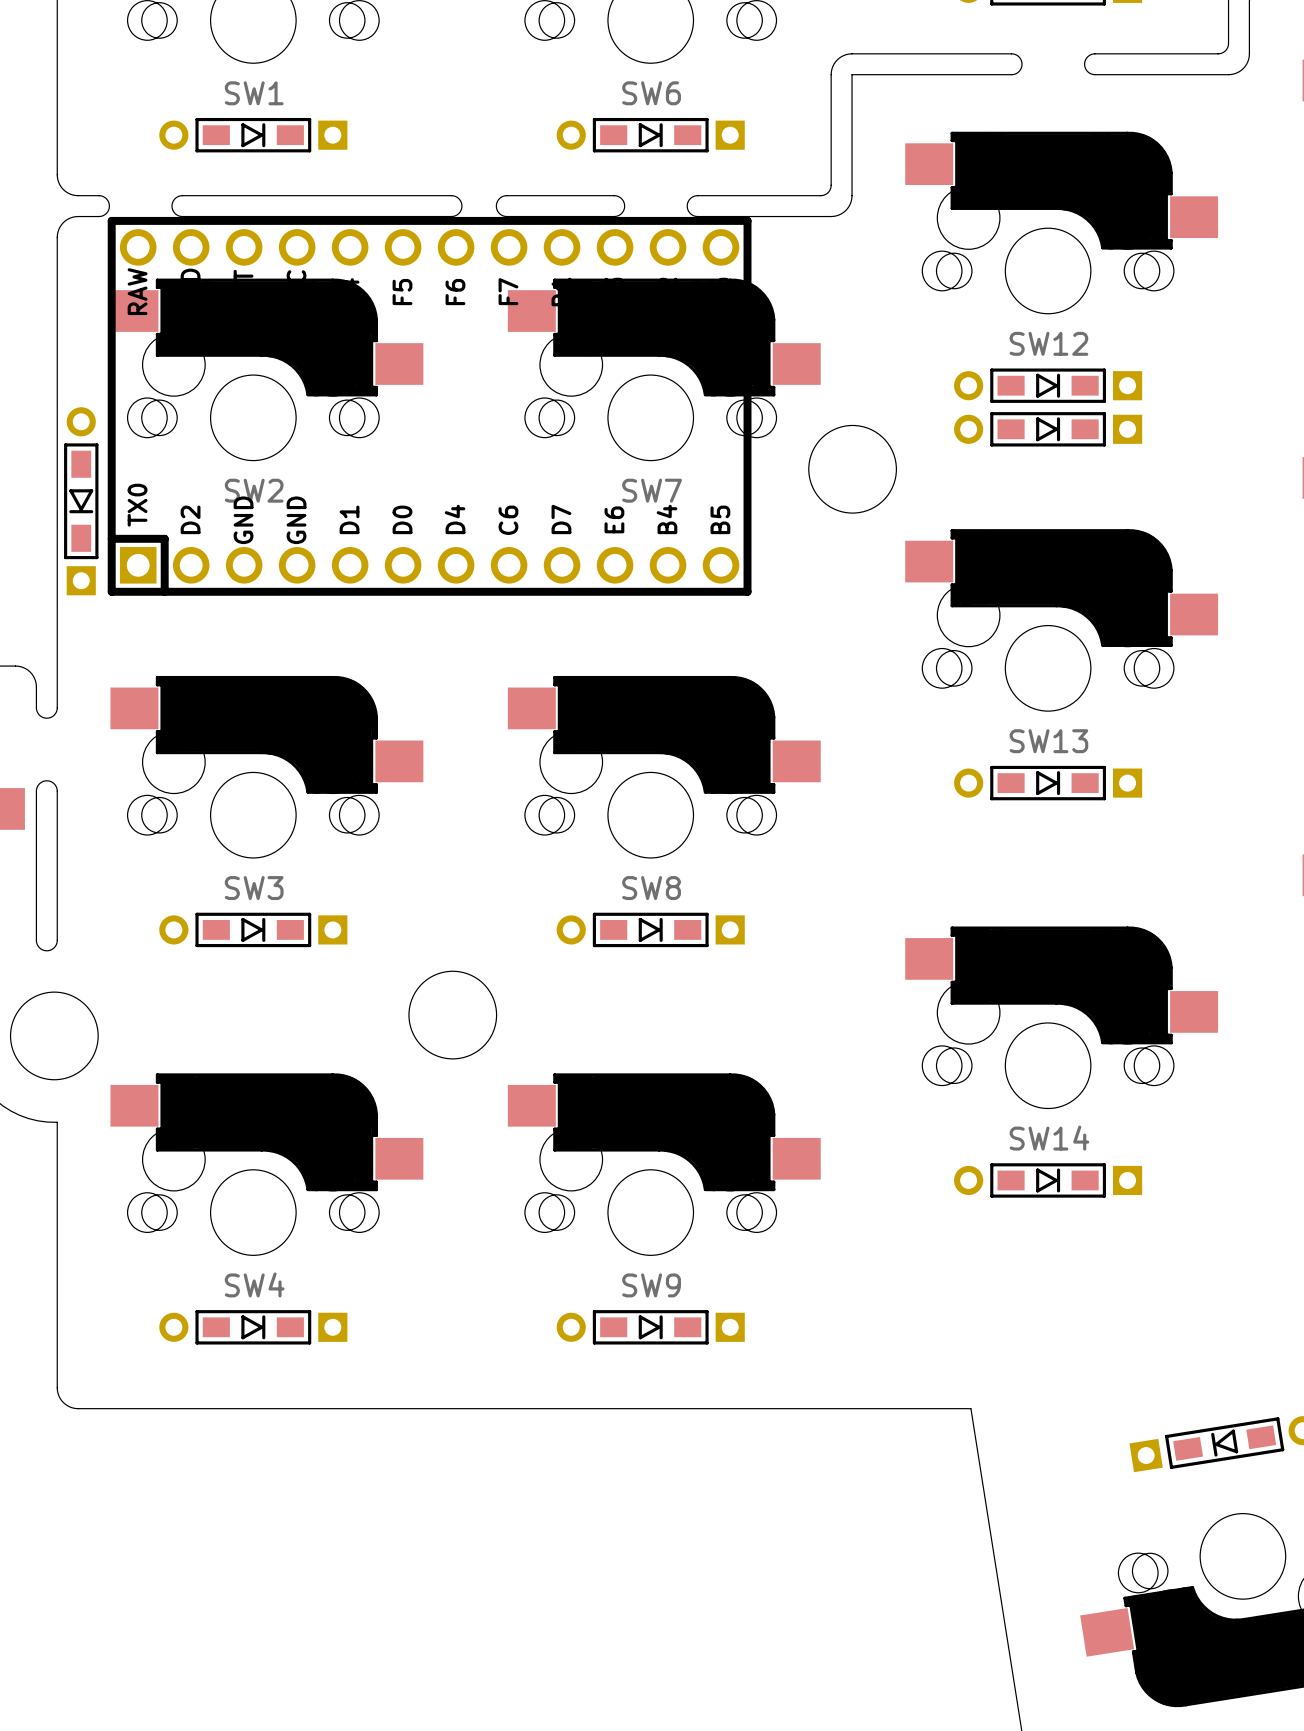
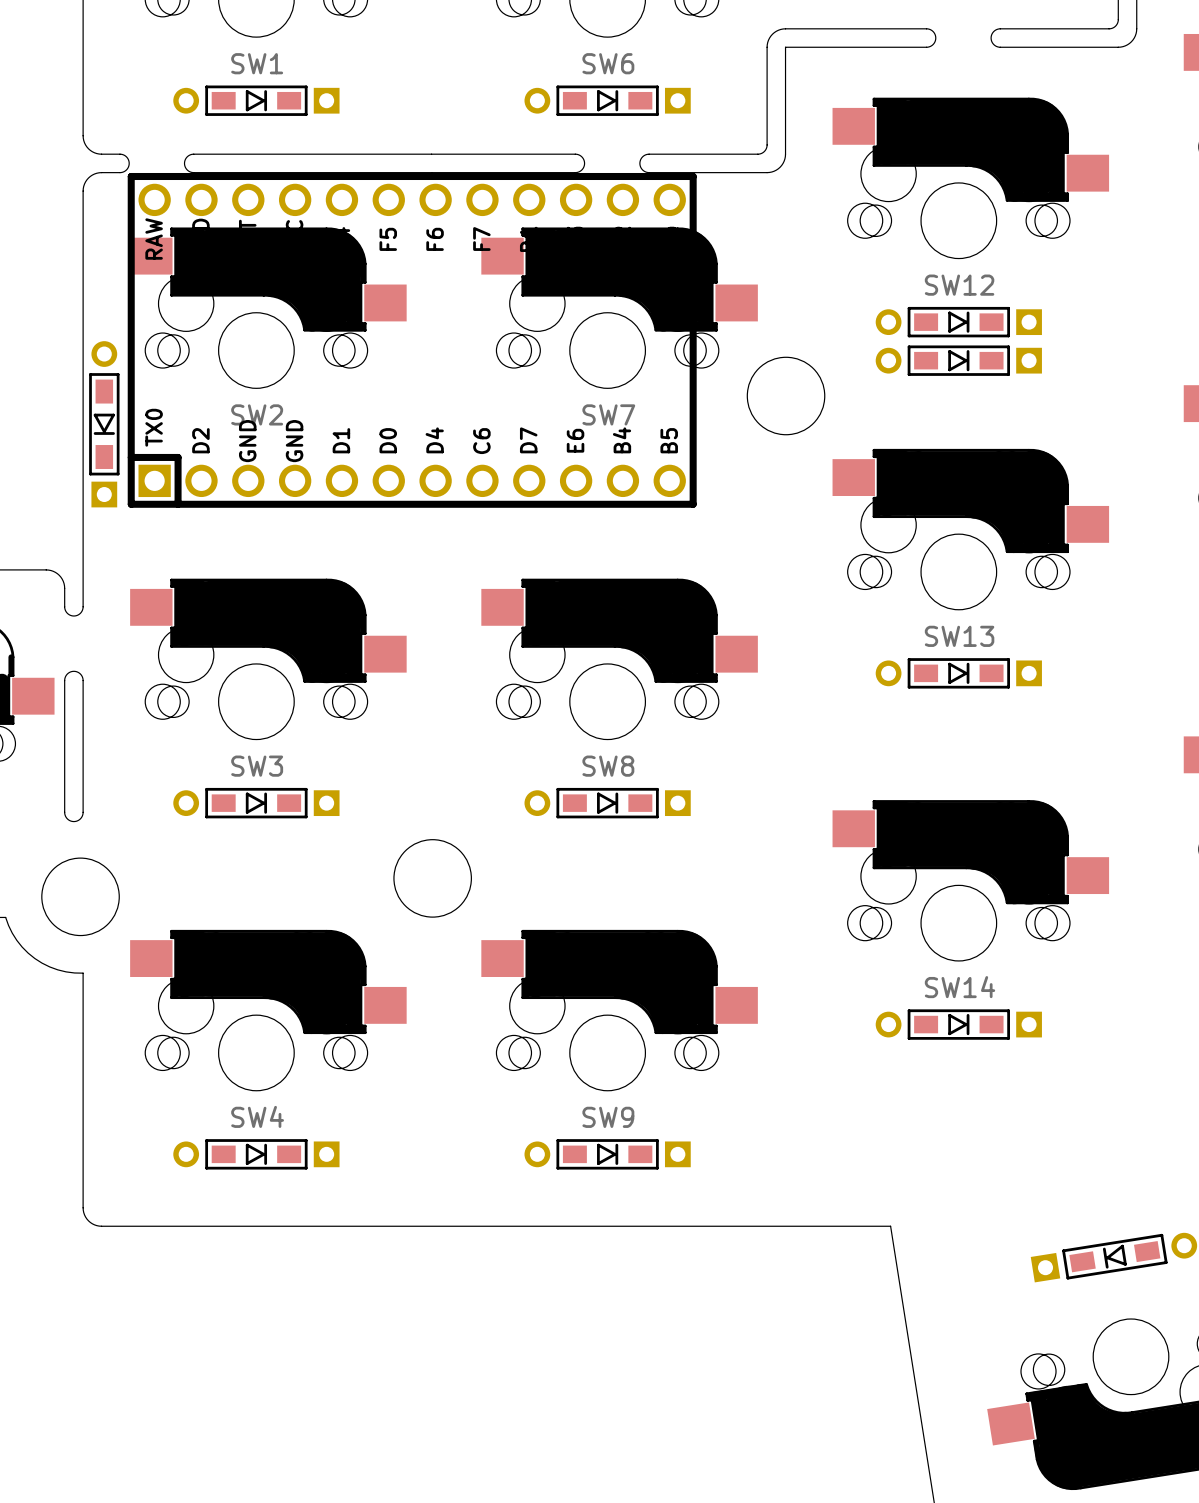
board edge: (451, 195) (458, 198) (461, 206) (458, 213) (451, 216) -> (480, 172) (431, 172)
board edge: (506, 195) (499, 198) (496, 206) (499, 213) (506, 216) -> (480, 154) (431, 154)

